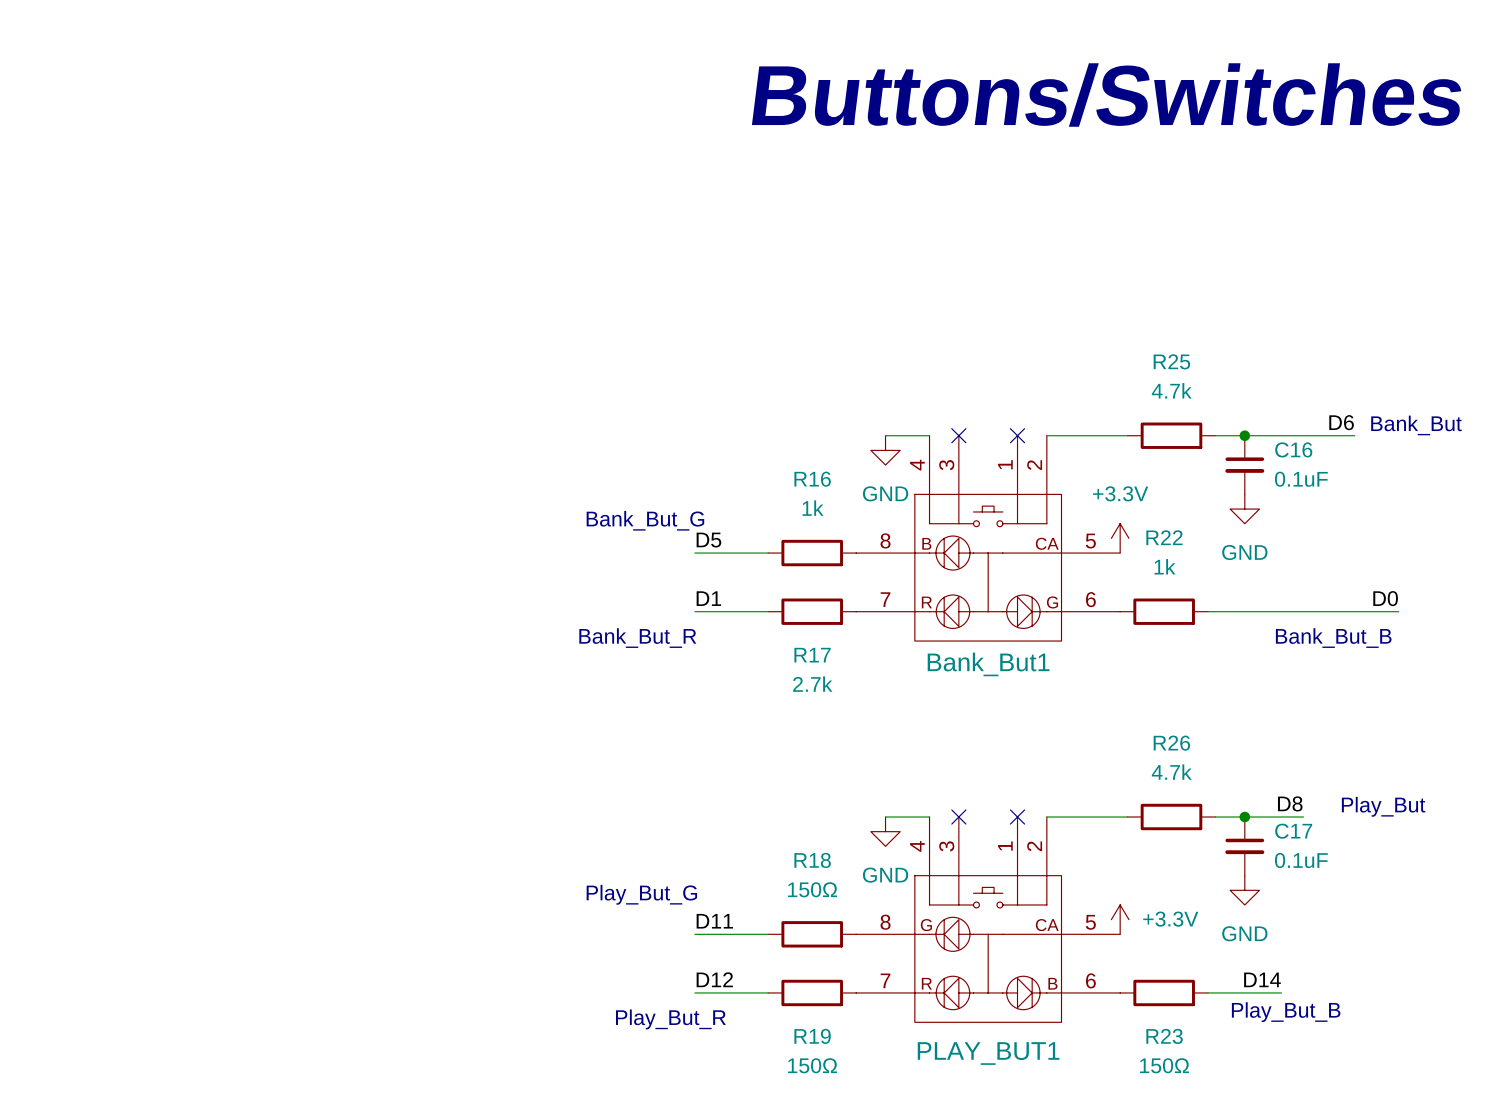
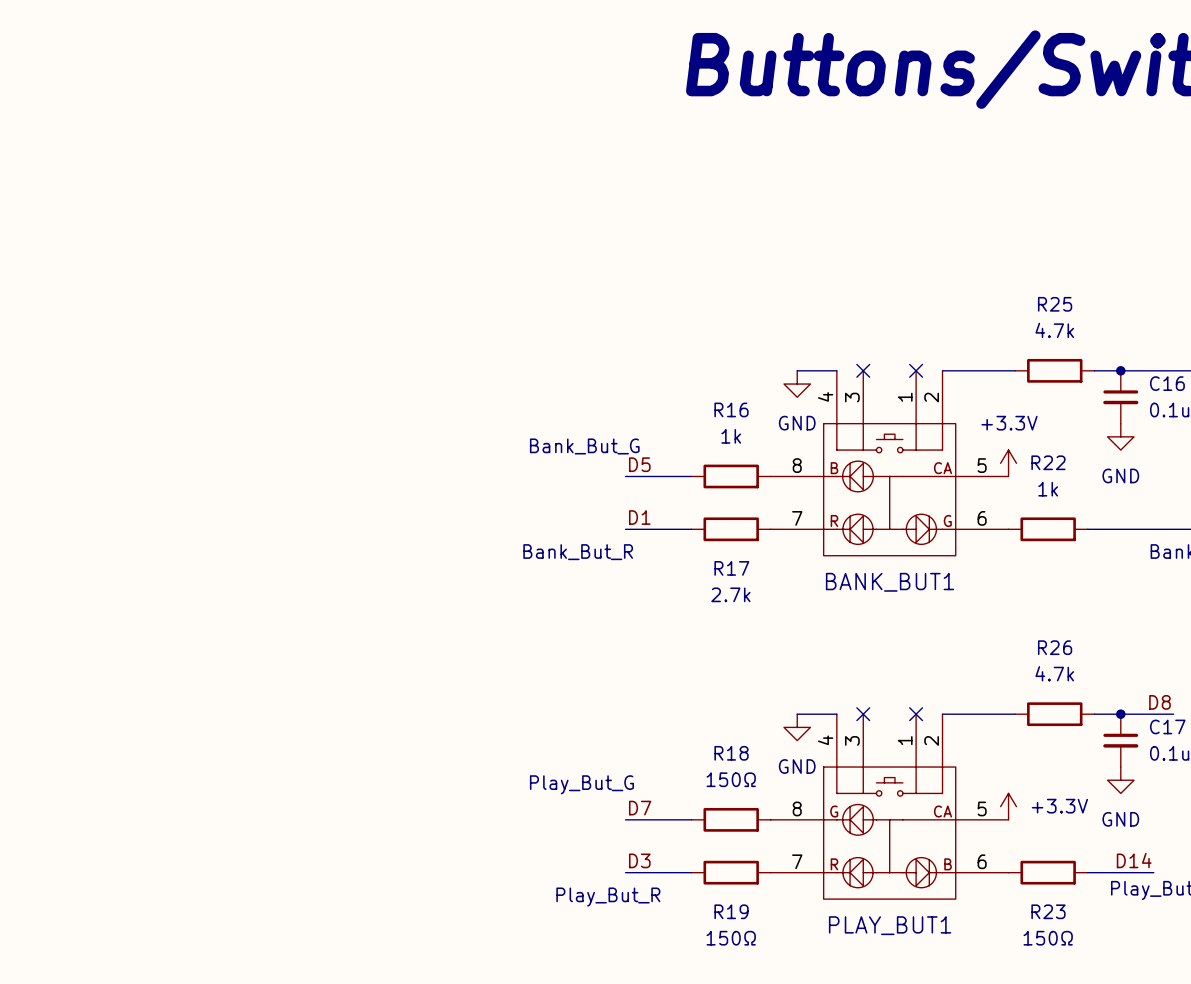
Bank_But1 name: Bank_But1 (988, 664) -> BANK_BUT1 (890, 582)
label: D11 (714, 921) -> D7 (640, 808)
label: D12 (714, 979) -> D3 (639, 860)

